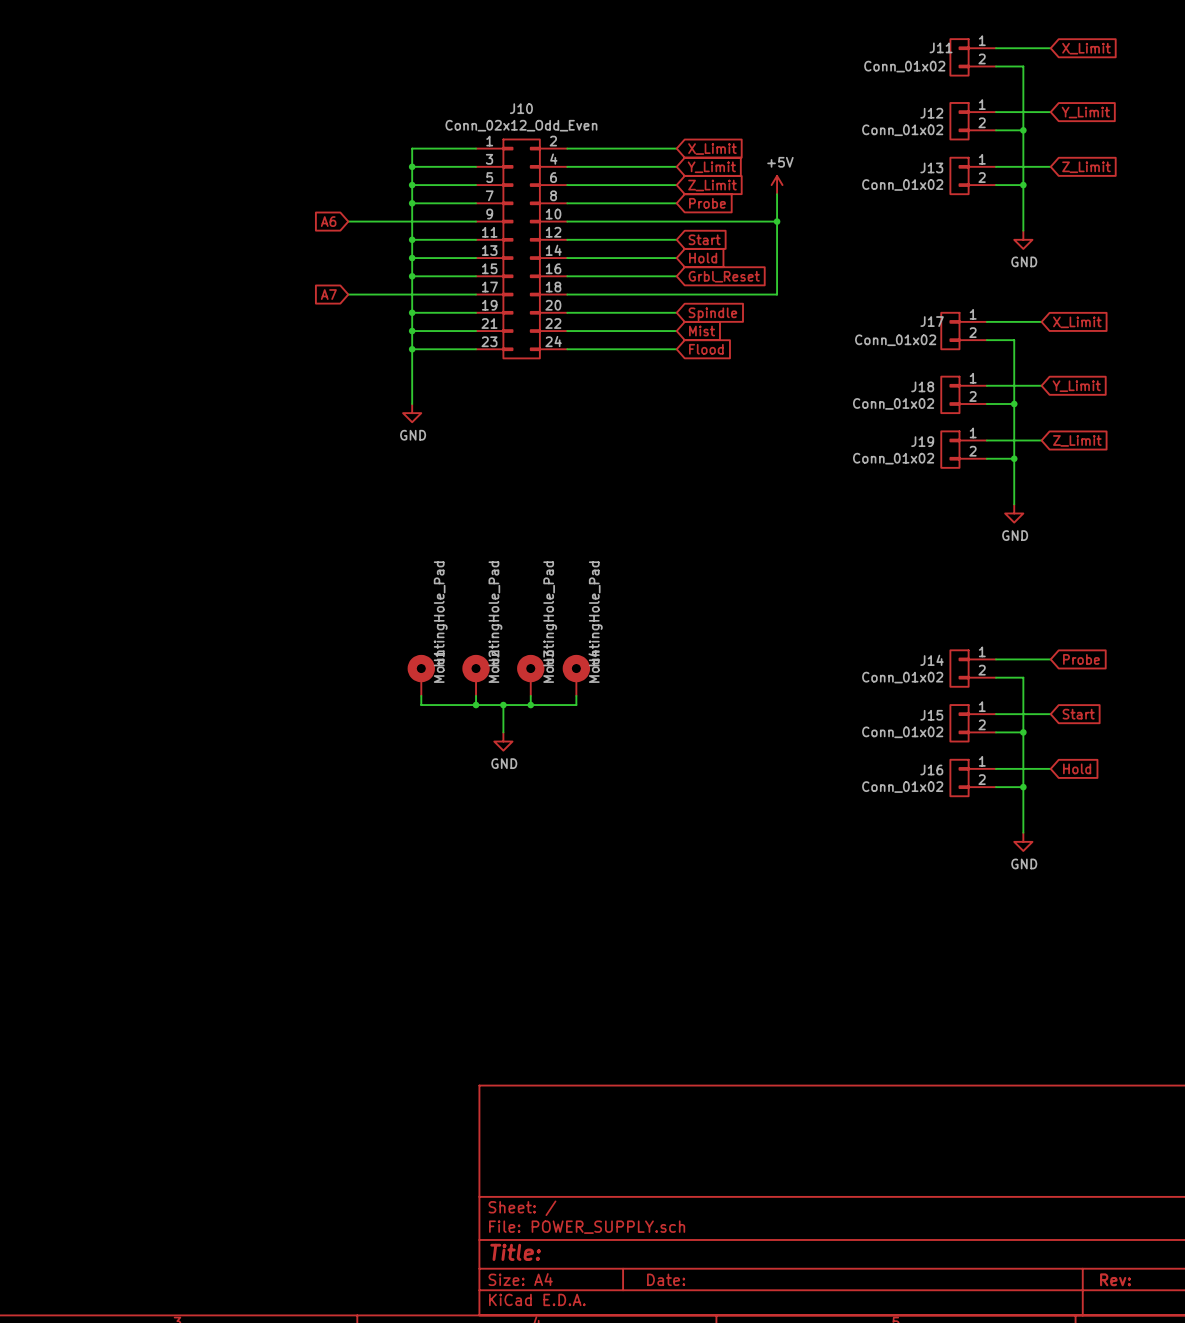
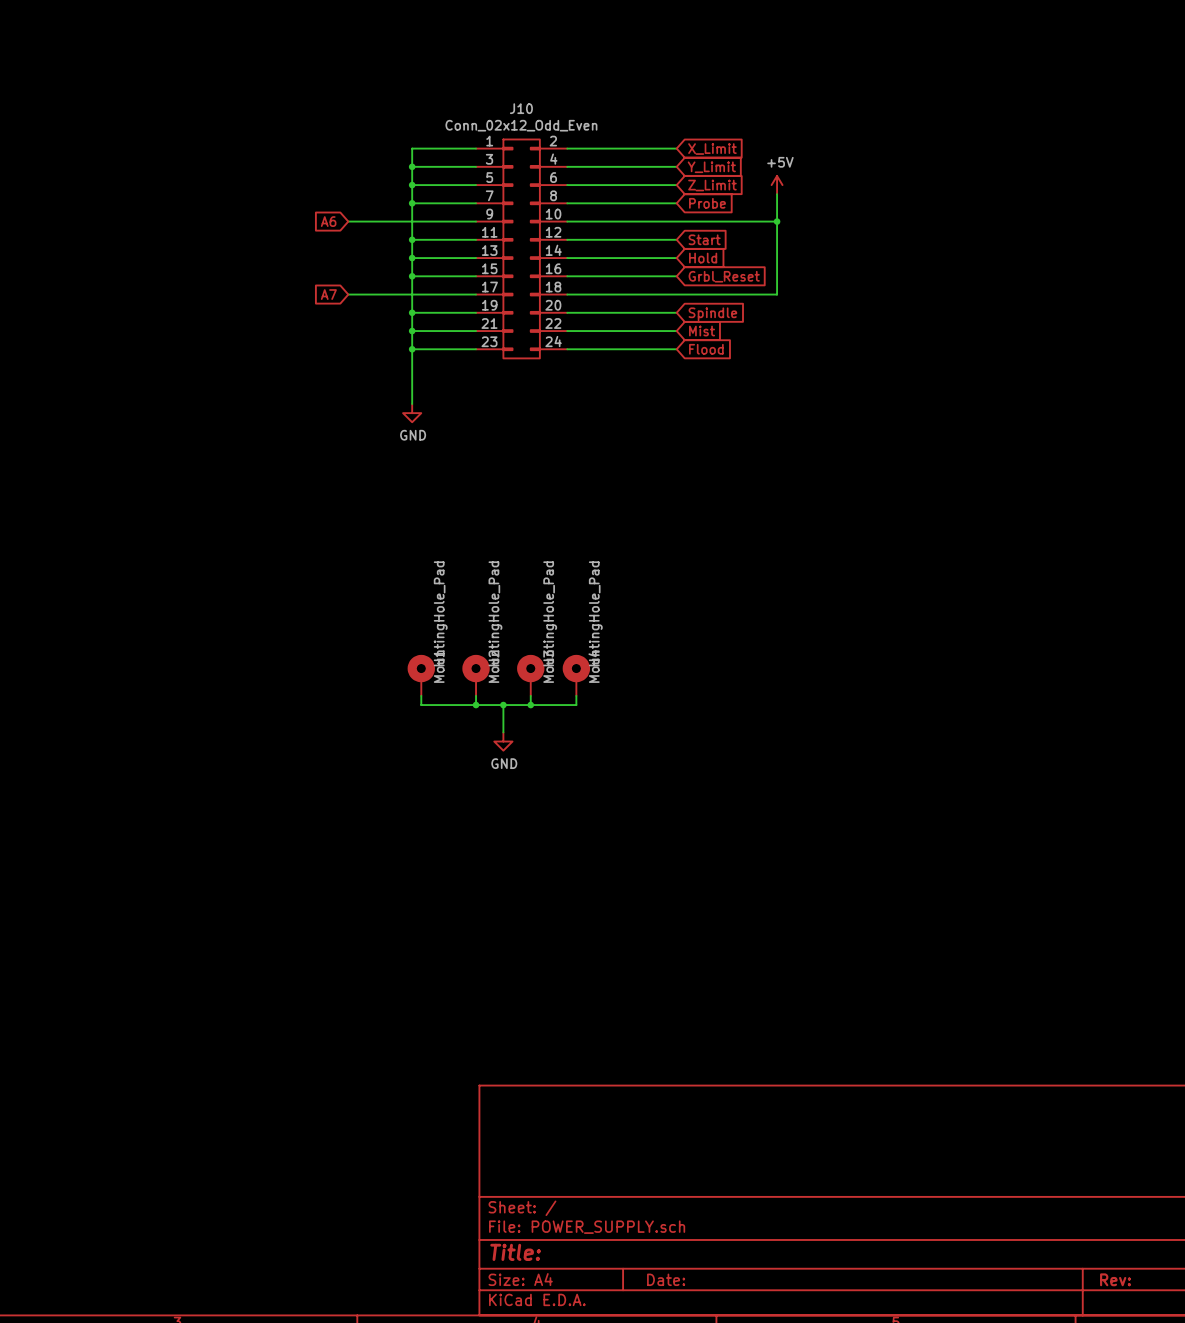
wire: (995, 48) (1050, 48) -> none
global label: X_Limit (1086, 48) -> none
J11: Conn_01x02 (972, 57) -> none
wire: (995, 66) (1023, 66) (1023, 230) -> none
wire: (995, 112) (1050, 112) -> none
global label: Y_Limit (1085, 112) -> none
J12: Conn_01x02 (972, 121) -> none
wire: (995, 130) (1023, 130) -> none
junction: (1023, 130) -> none
wire: (995, 166) (1050, 166) -> none
global label: Z_Limit (1086, 167) -> none
J13: Conn_01x02 (972, 175) -> none
wire: (995, 185) (1023, 185) -> none
junction: (1023, 185) -> none
power symbol: GND (1023, 239) -> none
wire: (986, 321) (1041, 321) -> none
global label: X_Limit (1077, 322) -> none
J17: Conn_01x02 (963, 331) -> none
wire: (986, 340) (1014, 340) (1014, 504) -> none
wire: (986, 385) (1041, 385) -> none
global label: Y_Limit (1076, 386) -> none
J18: Conn_01x02 (963, 394) -> none
wire: (986, 404) (1014, 404) -> none
junction: (1014, 404) -> none
wire: (986, 440) (1041, 440) -> none
global label: Z_Limit (1077, 440) -> none
J19: Conn_01x02 (963, 449) -> none
wire: (986, 458) (1014, 458) -> none
junction: (1014, 458) -> none
power symbol: GND (1014, 513) -> none
wire: (995, 659) (1050, 659) -> none
global label: Probe (1081, 659) -> none
J14: Conn_01x02 (972, 668) -> none
wire: (995, 677) (1023, 677) (1023, 832) -> none
wire: (995, 714) (1050, 714) -> none
global label: Start (1078, 714) -> none
J15: Conn_01x02 (972, 723) -> none
wire: (995, 732) (1023, 732) -> none
junction: (1023, 732) -> none
wire: (995, 768) (1050, 768) -> none
global label: Hold (1077, 768) -> none
J16: Conn_01x02 (972, 778) -> none
wire: (995, 787) (1023, 787) -> none
junction: (1023, 787) -> none
power symbol: GND (1023, 841) -> none

